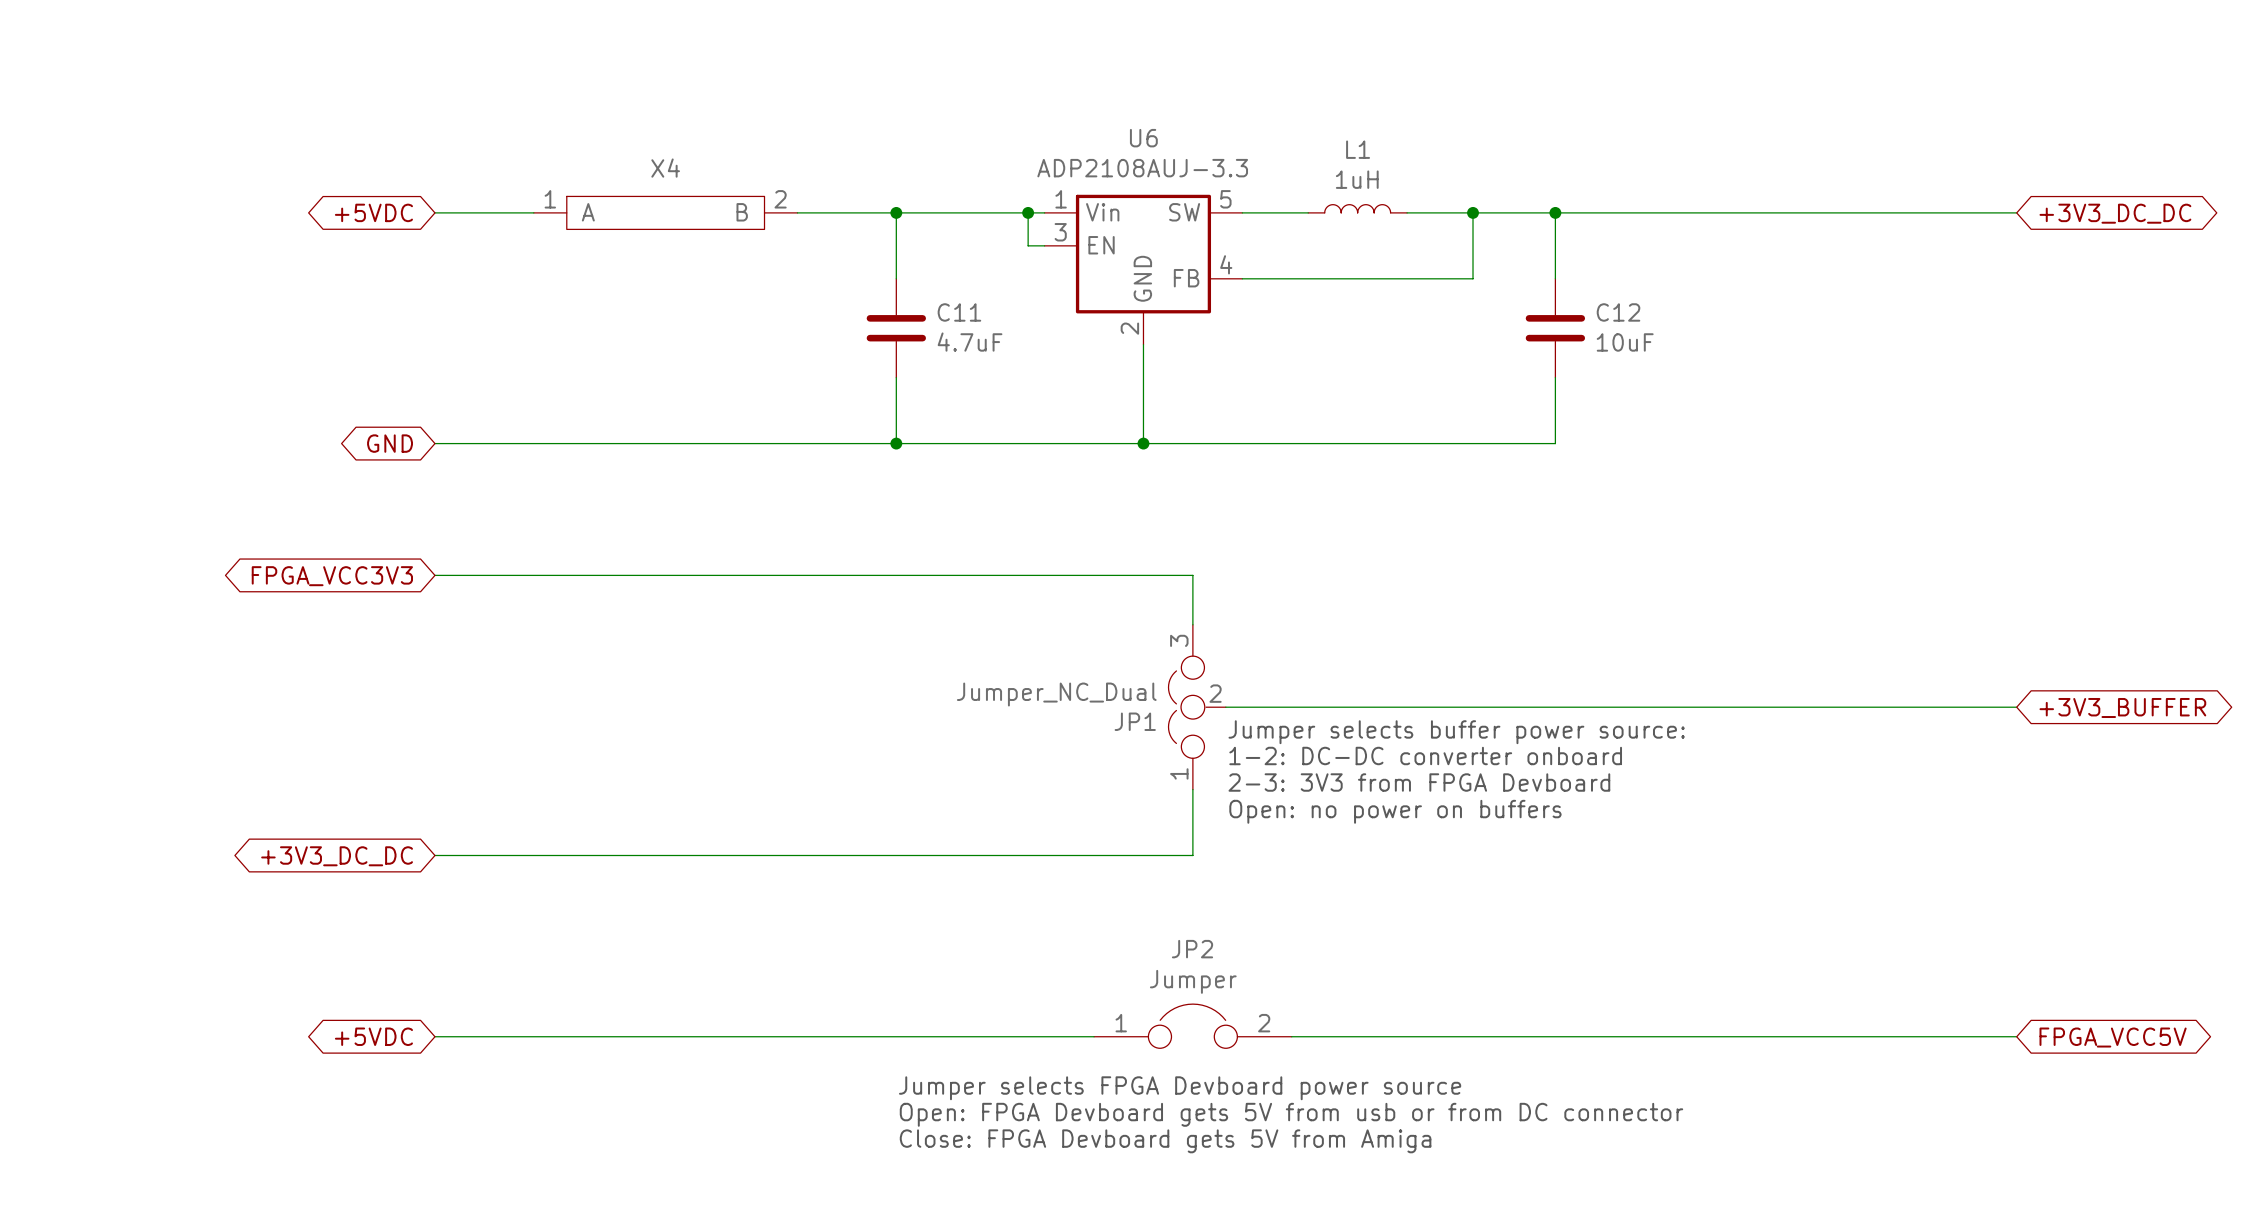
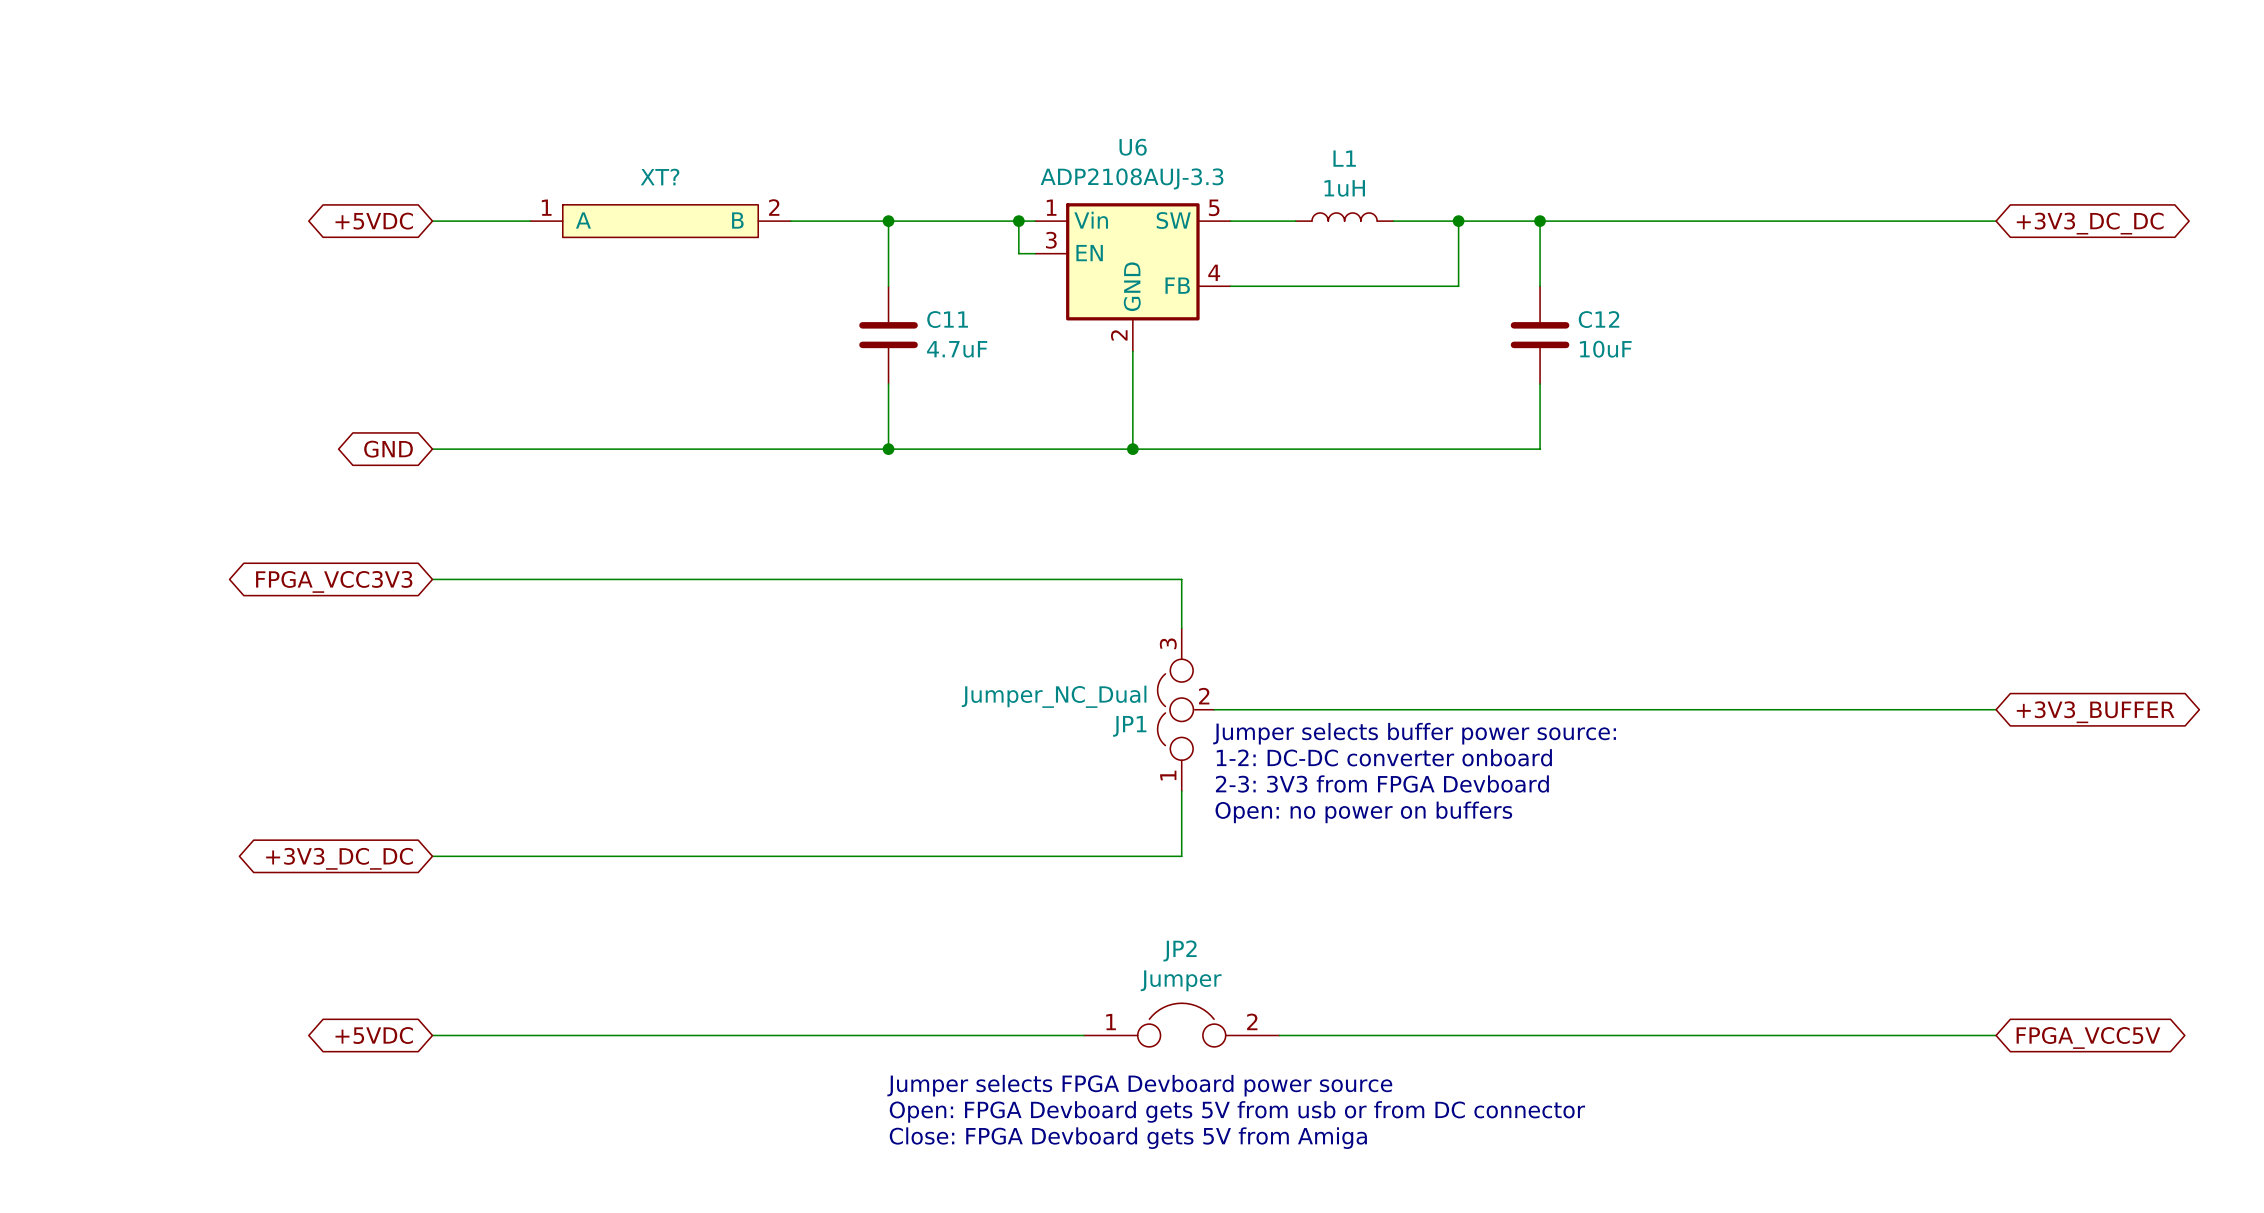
X4 name: X4 (665, 168) -> XT? (660, 177)

